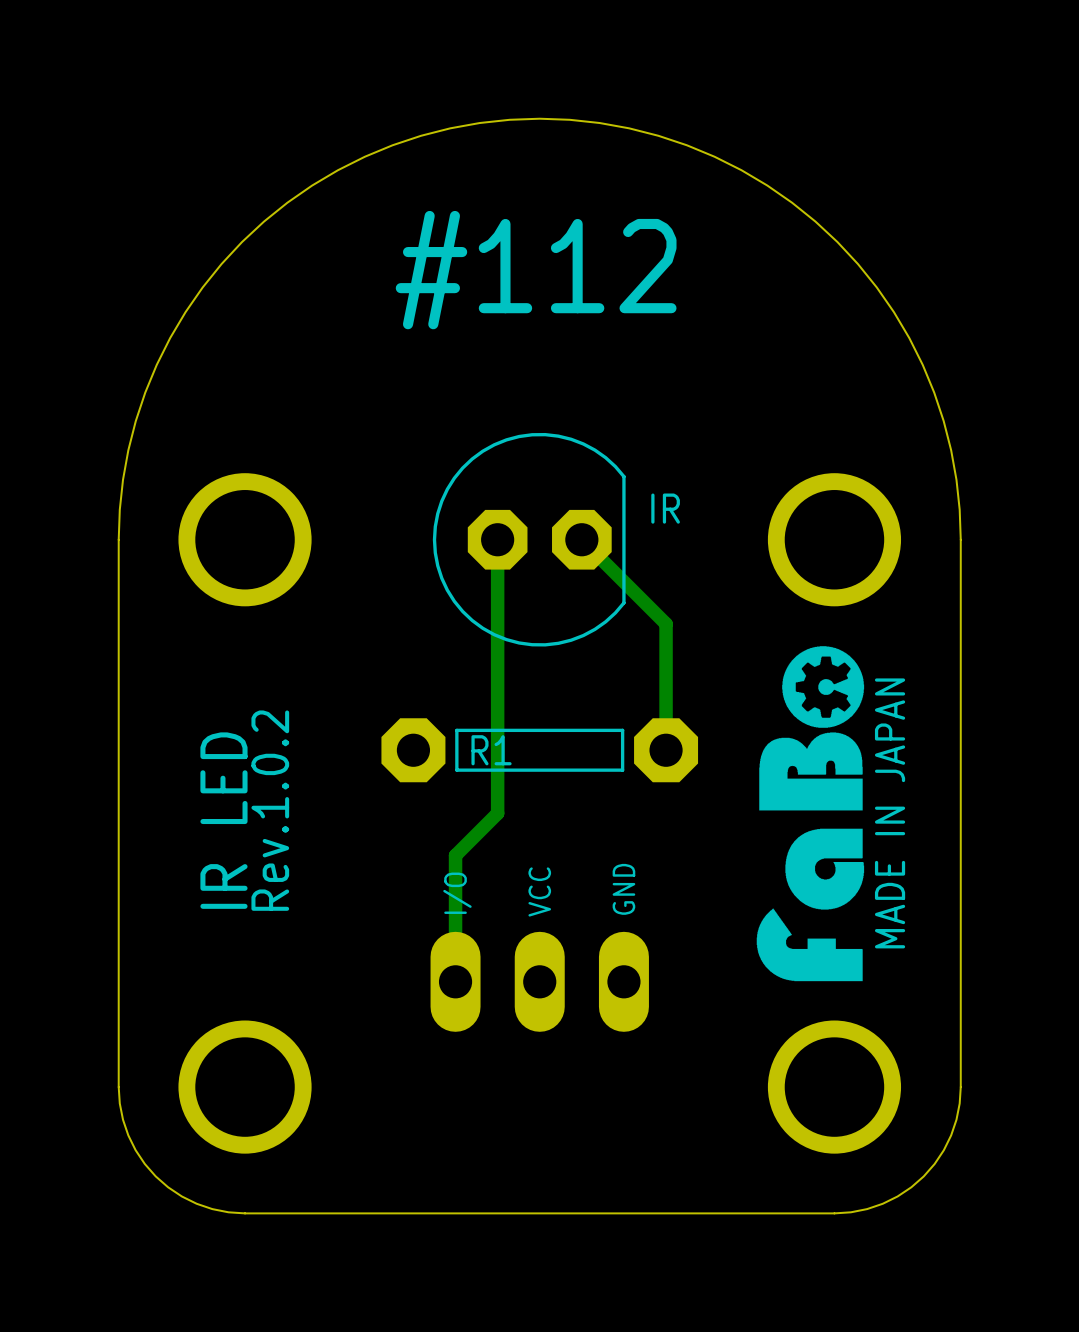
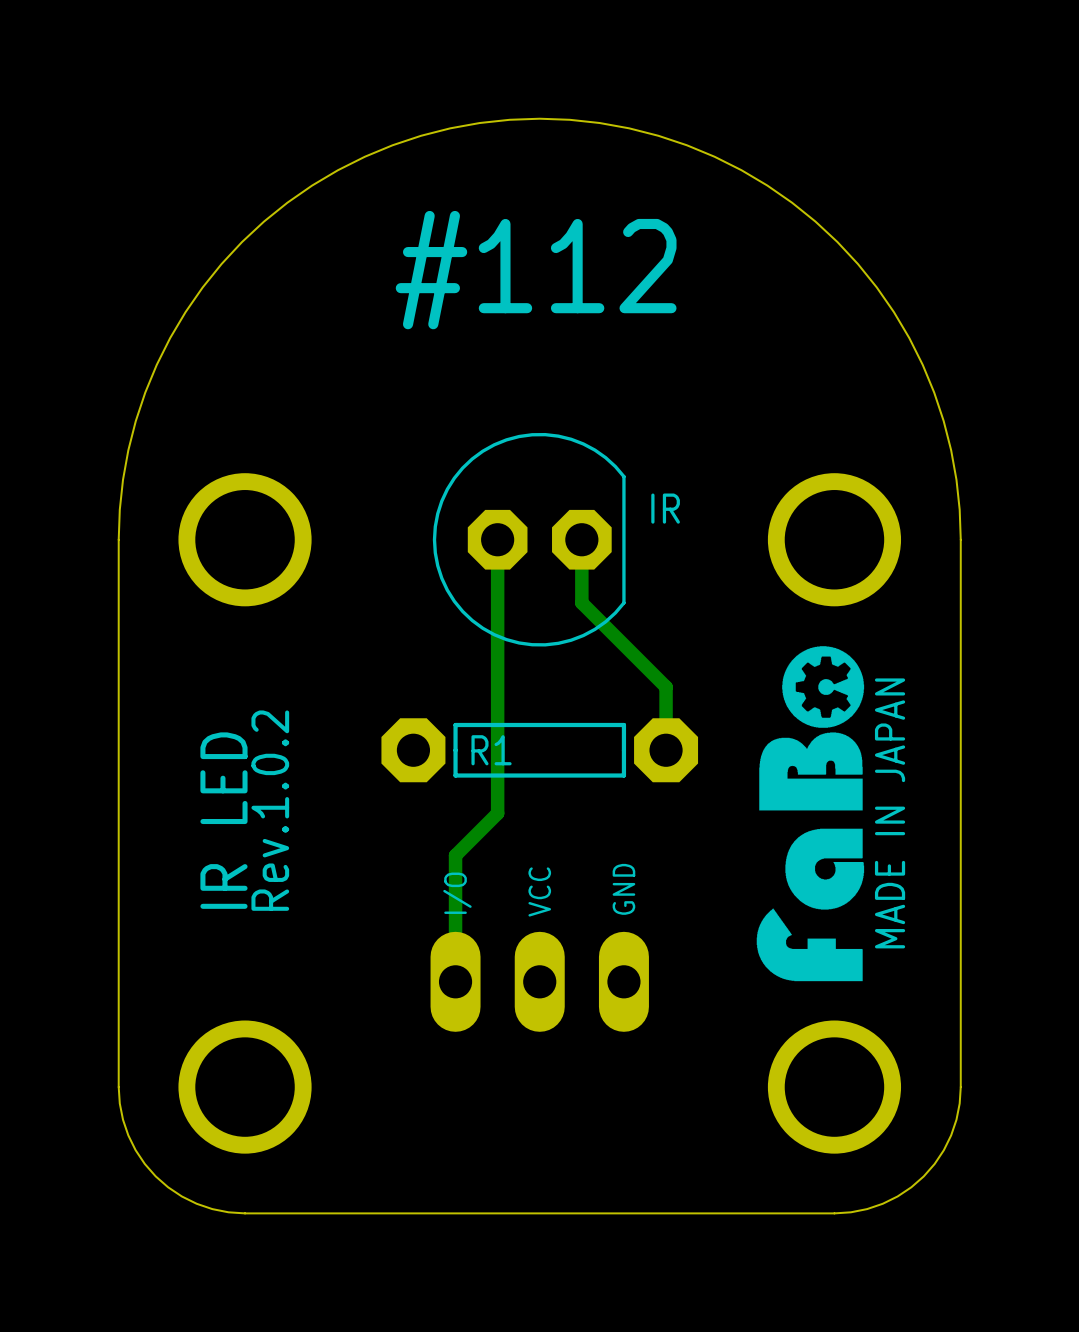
bottom track: (581, 539) (666, 623) (666, 687) -> (581, 539) (581, 602) (666, 687)
R1 footprint: [381, 718, 699, 783] -> [381, 718, 699, 783]

